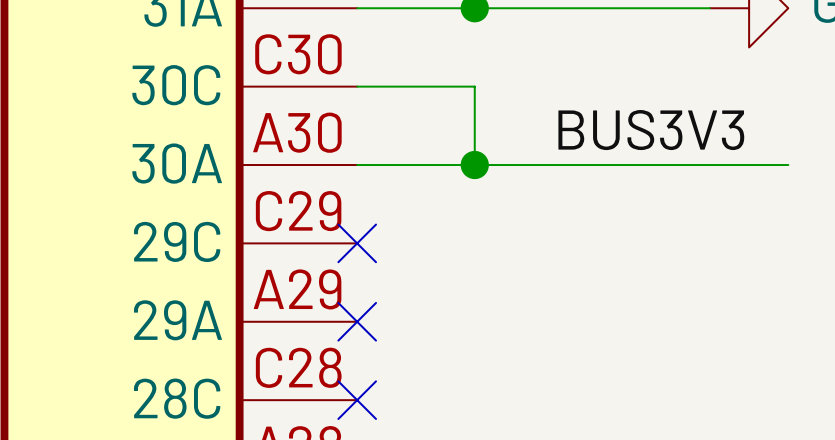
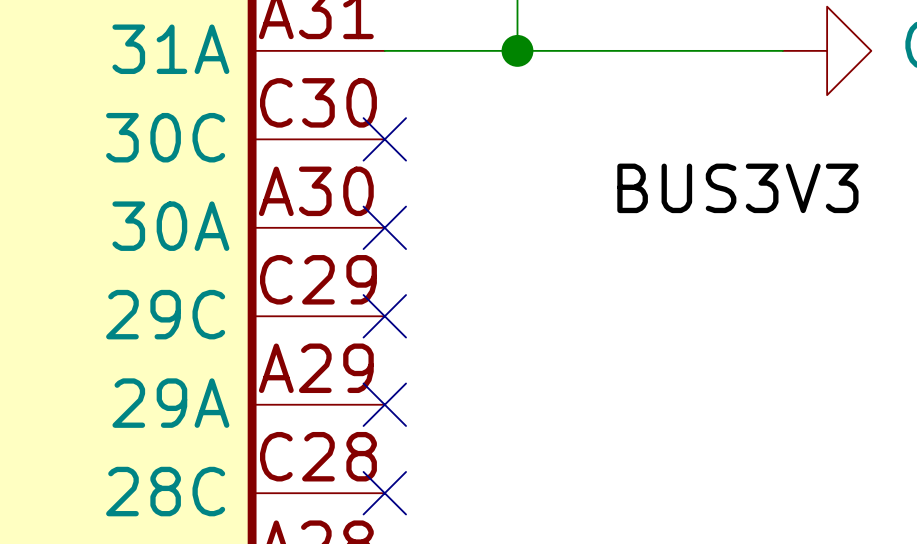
wire: (357, 86) (474, 86) (474, 165) -> none
no-connect mark: none -> (384, 139)
wire: (357, 165) (788, 165) -> none
no-connect mark: none -> (384, 227)
junction: (474, 165) -> none

